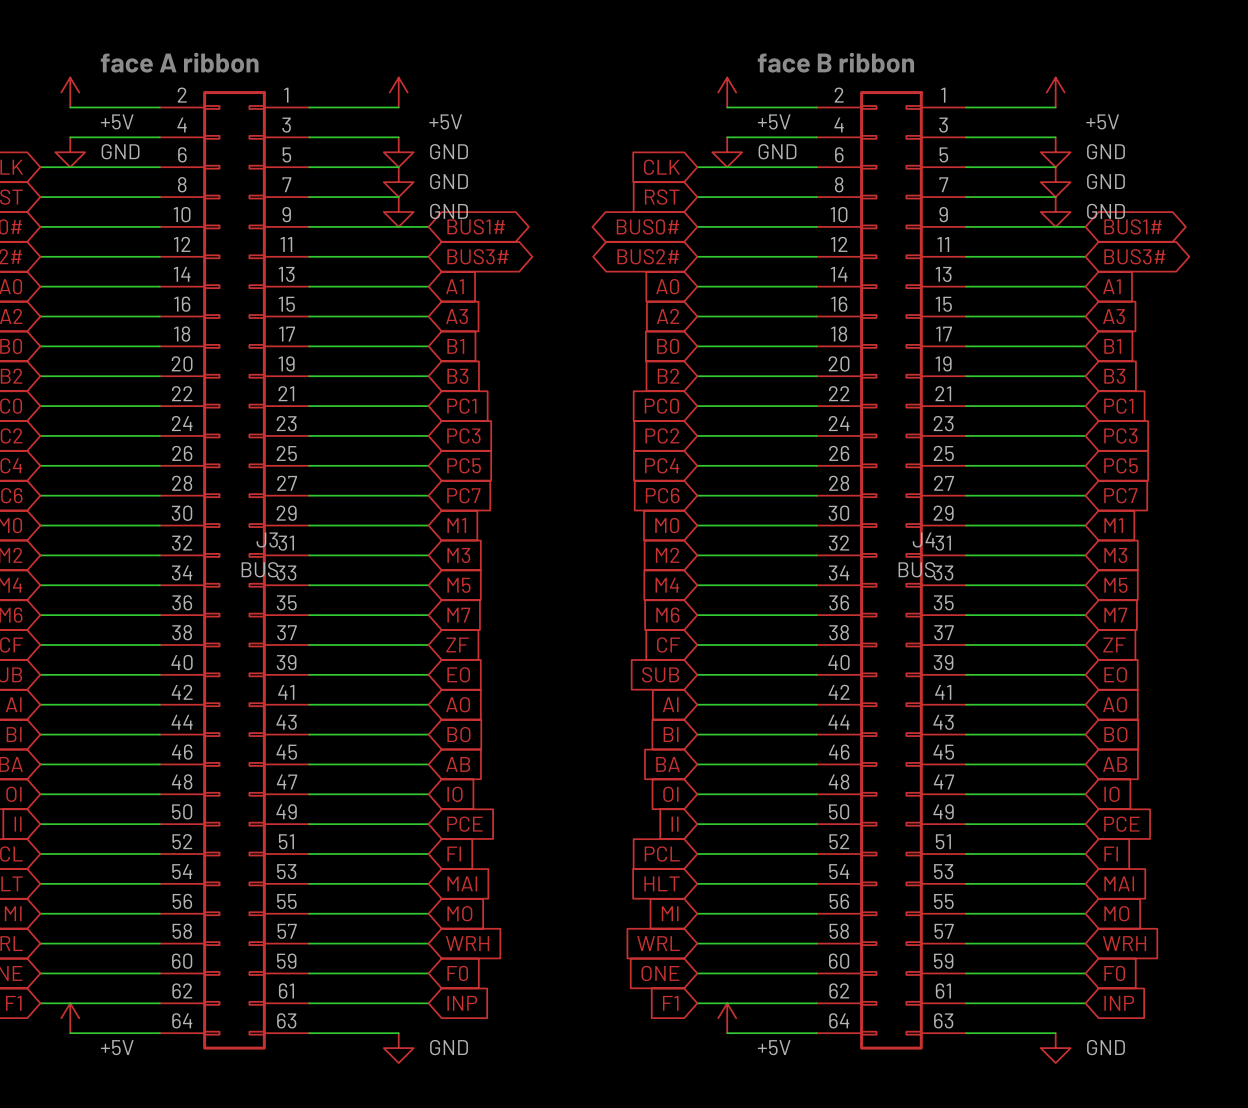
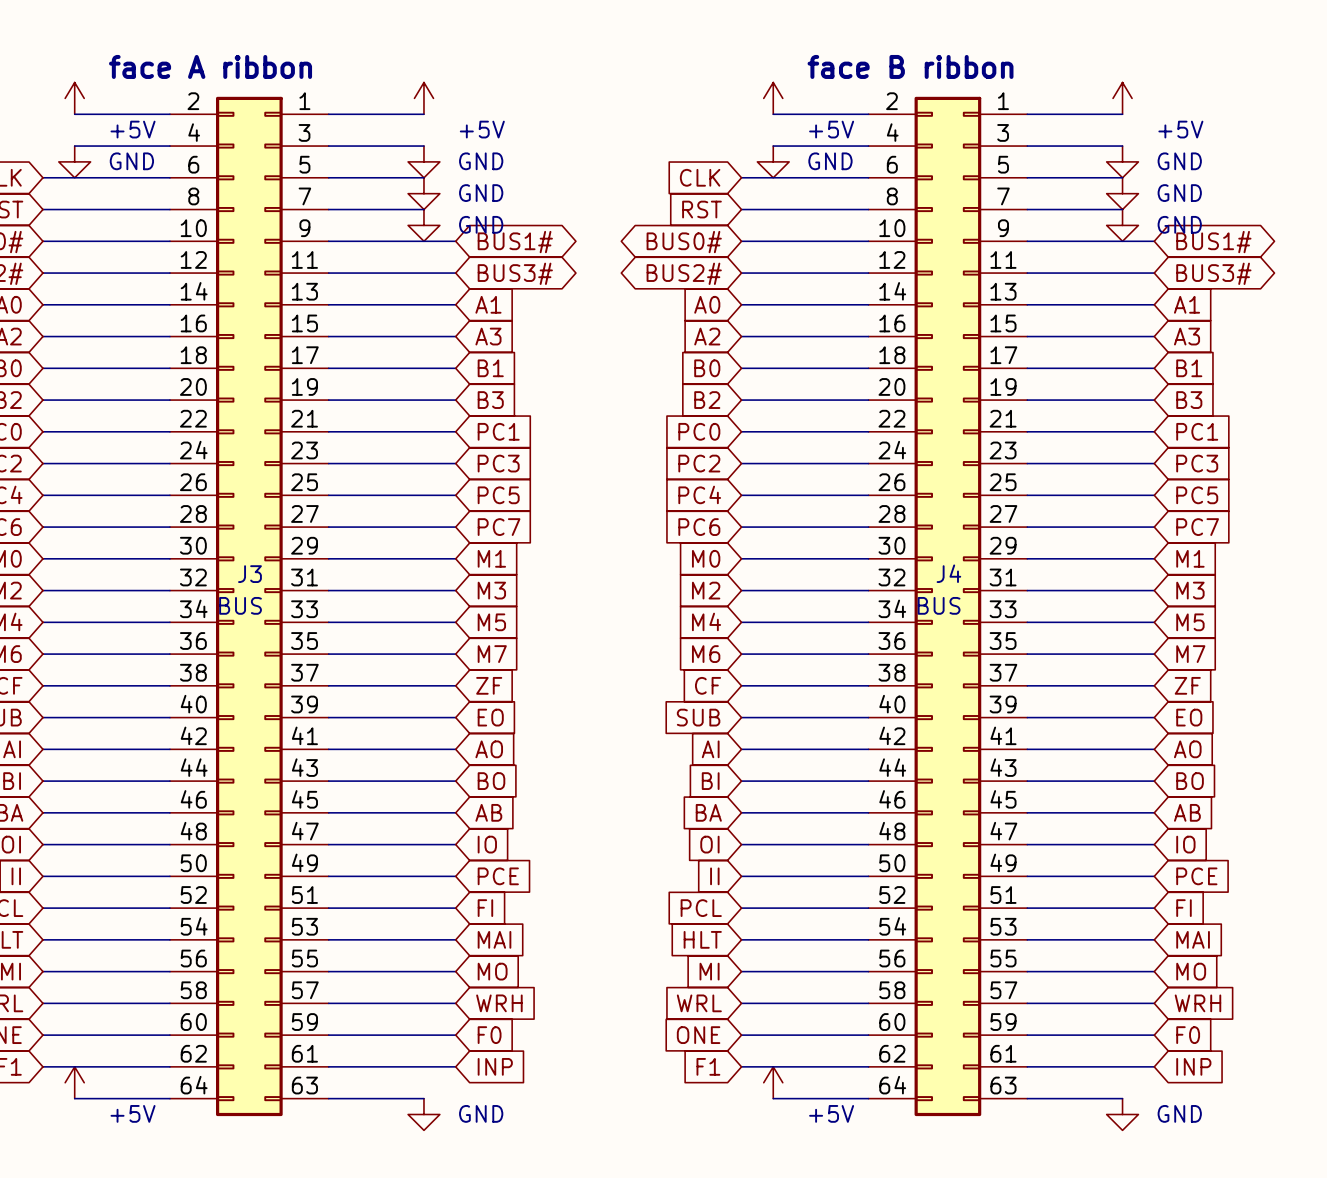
J3 name position: J3 (267, 539) -> J3 (249, 574)
J4 name position: J4 (923, 539) -> J4 (948, 573)
J3 value position: BUS (259, 569) -> BUS (240, 605)
J4 value position: BUS (916, 569) -> BUS (939, 605)

